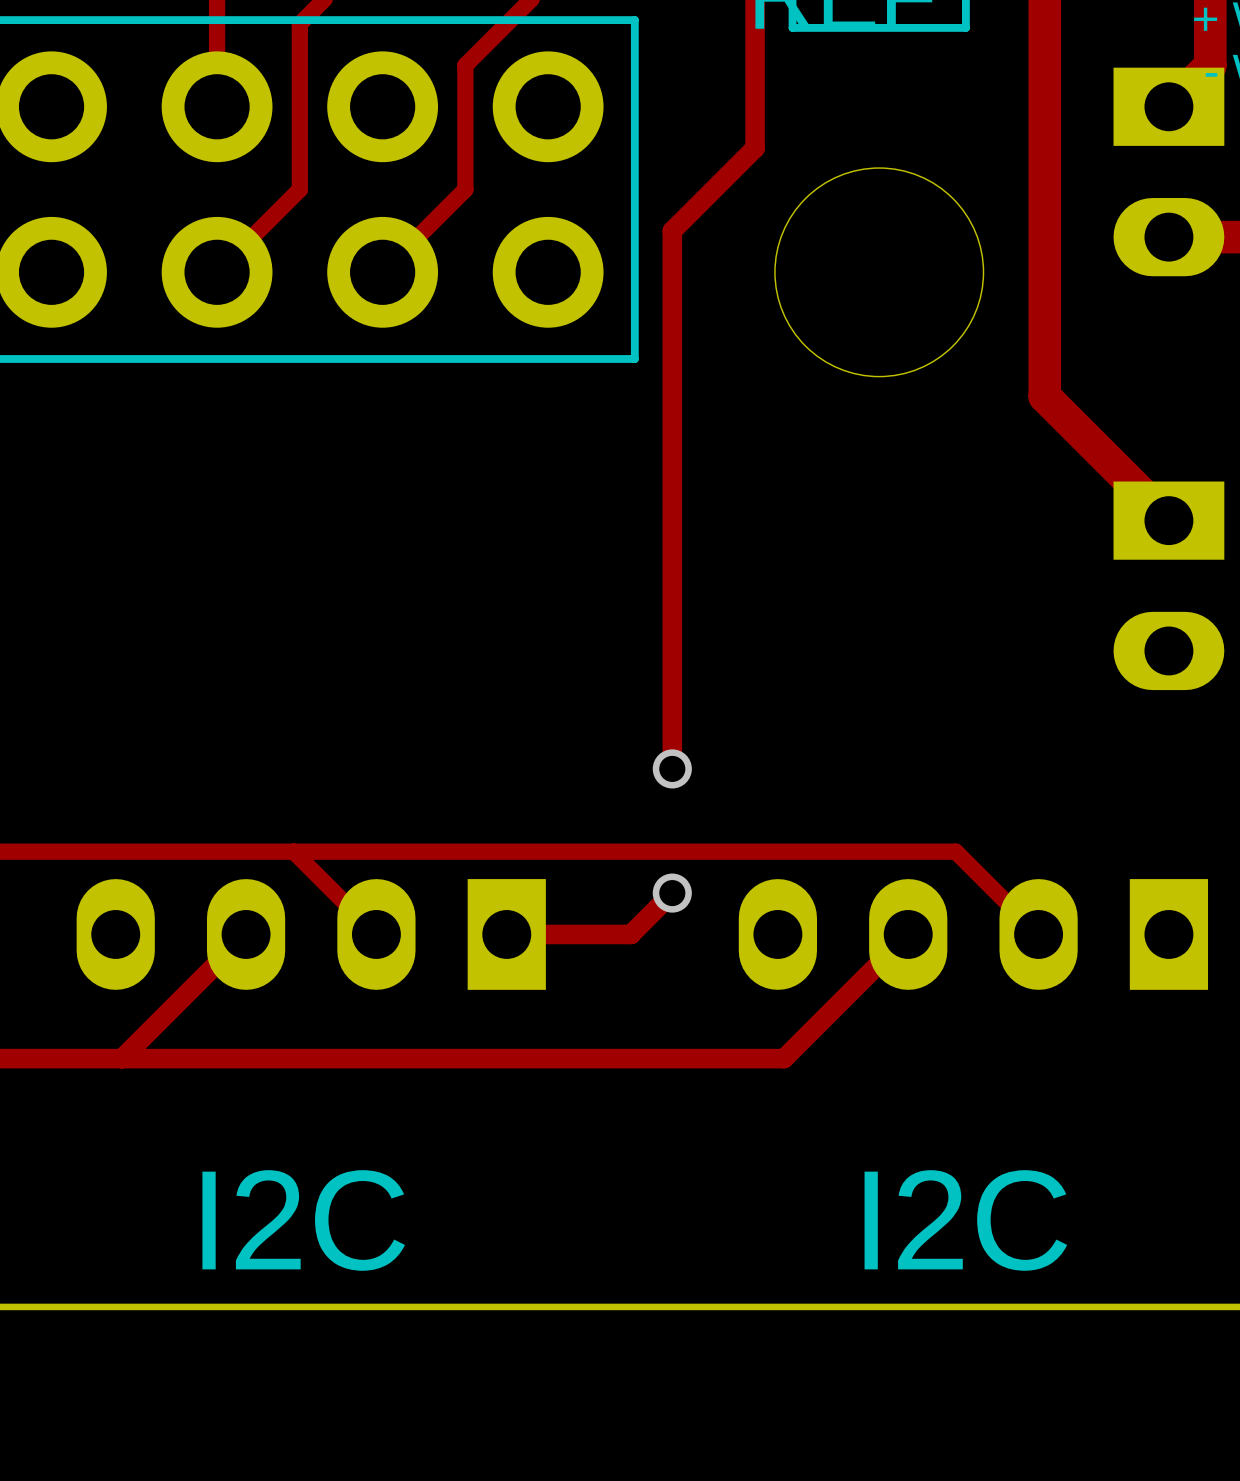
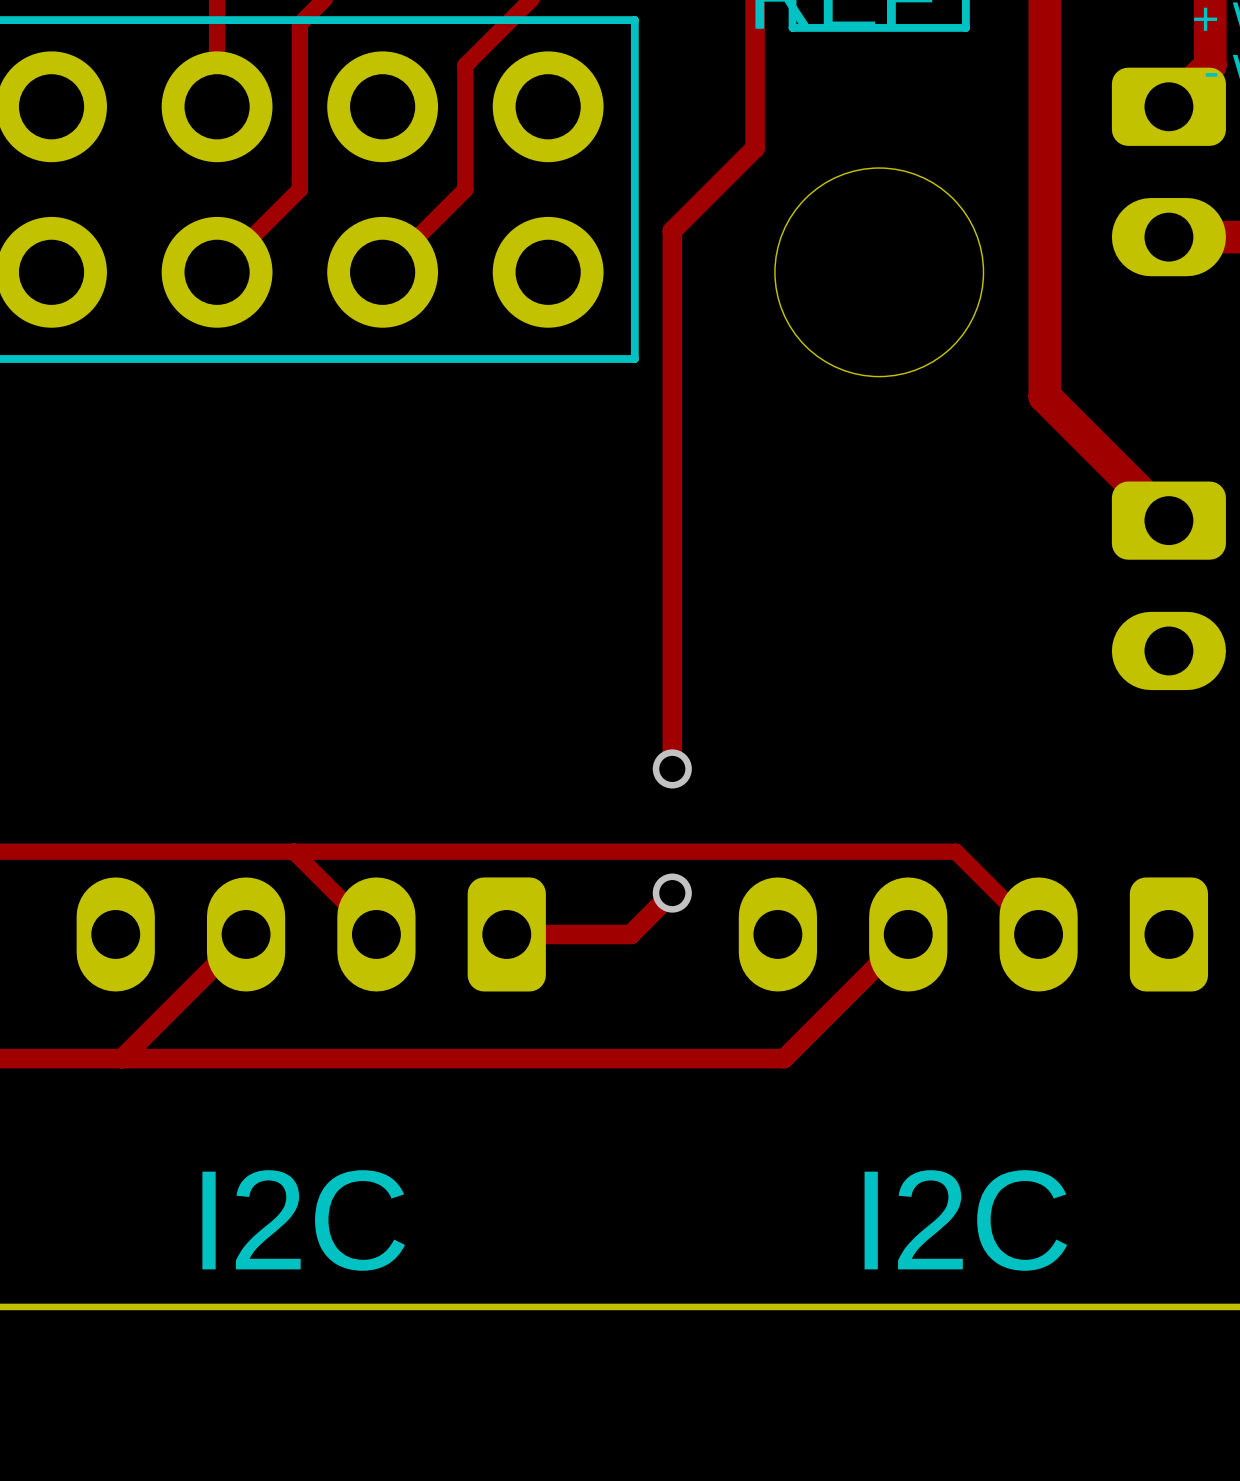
part footprint: [1113, 67, 1225, 277] -> [1111, 67, 1226, 277]
part footprint: [1113, 481, 1225, 691] -> [1111, 481, 1226, 691]
part footprint: [76, 879, 546, 990] -> [76, 877, 546, 992]
part footprint: [738, 879, 1209, 990] -> [738, 877, 1209, 992]

